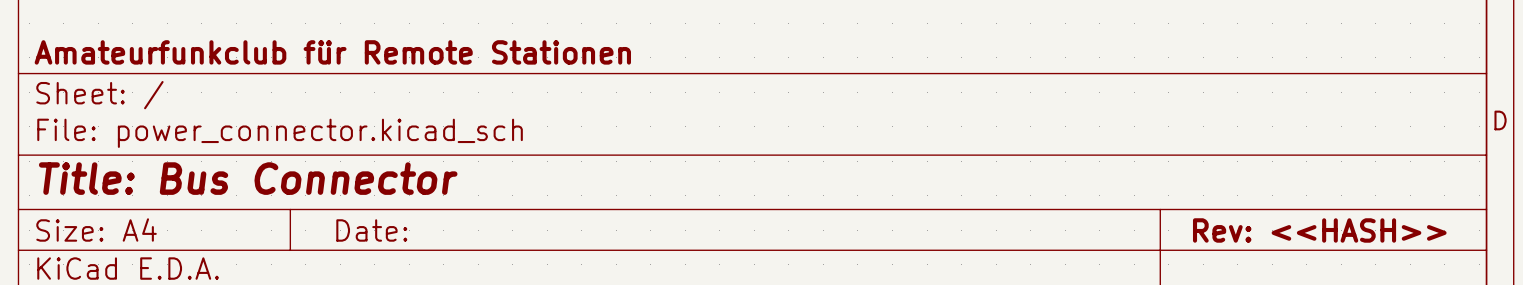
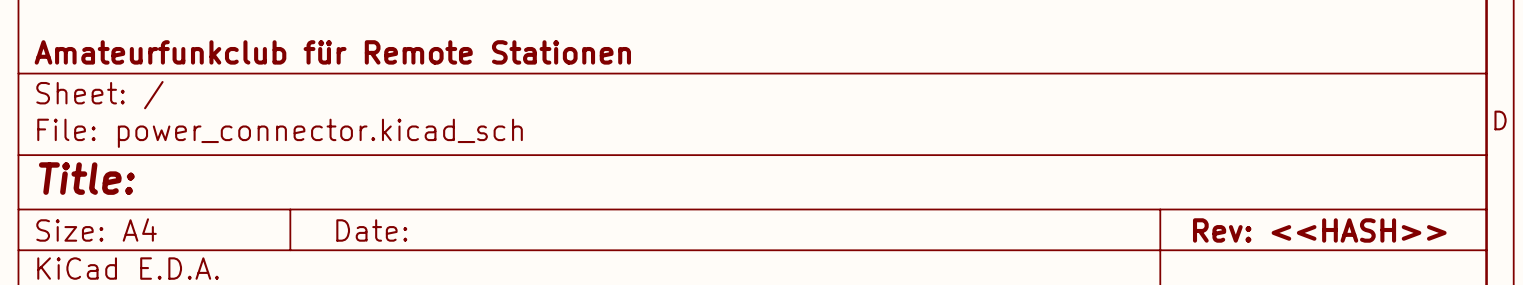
title block: Title: Bus Connector (248, 178) -> Title: (86, 178)

